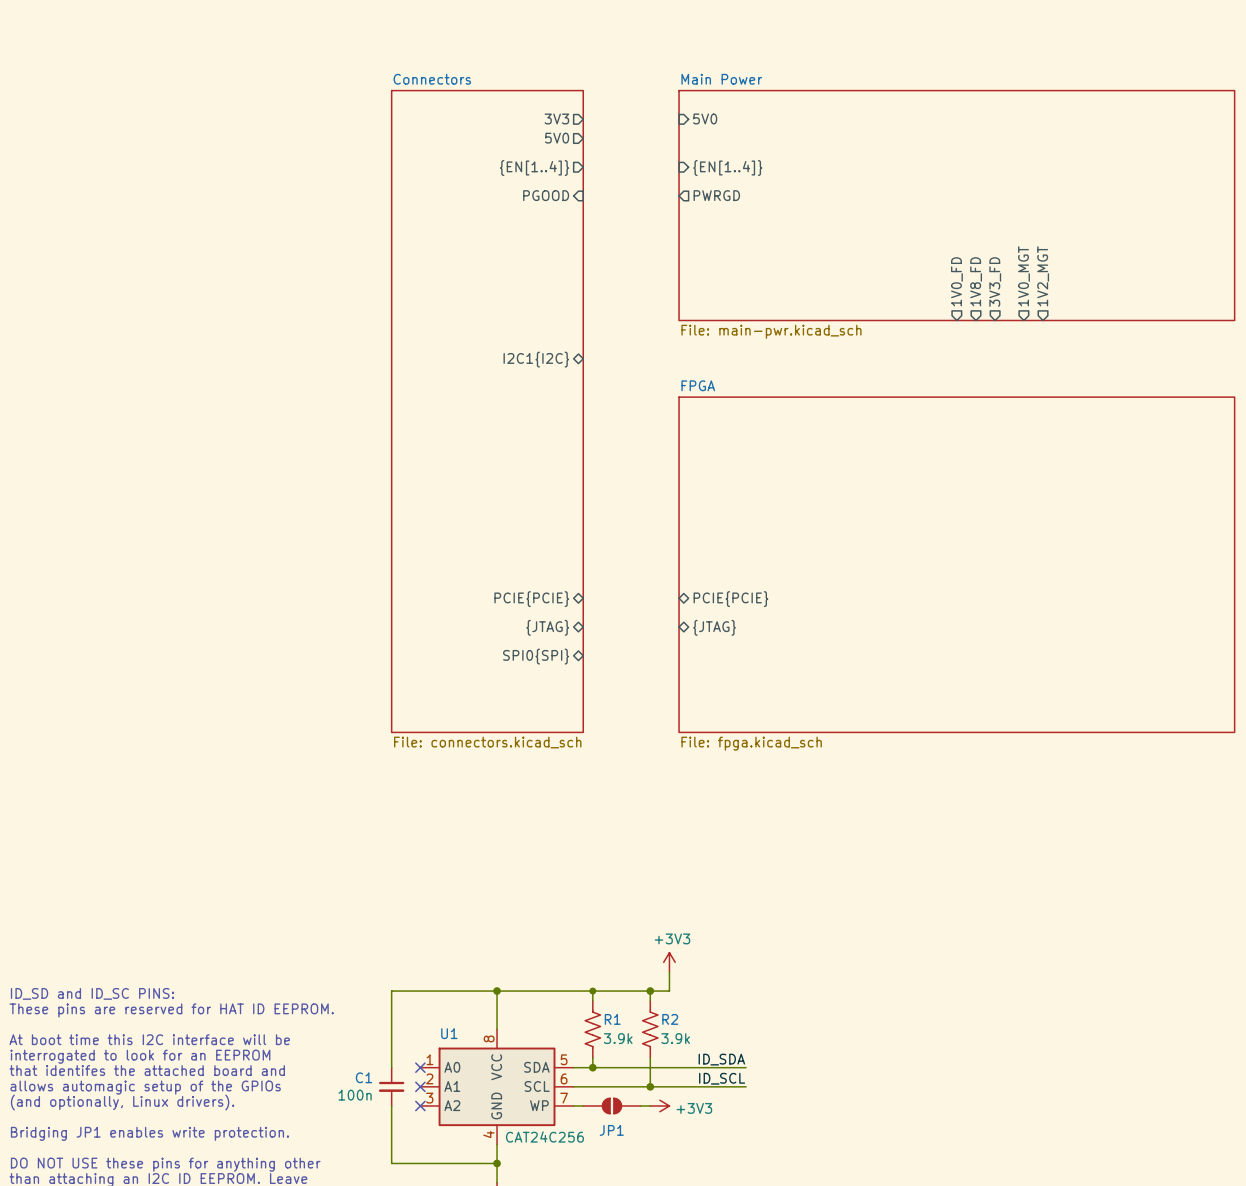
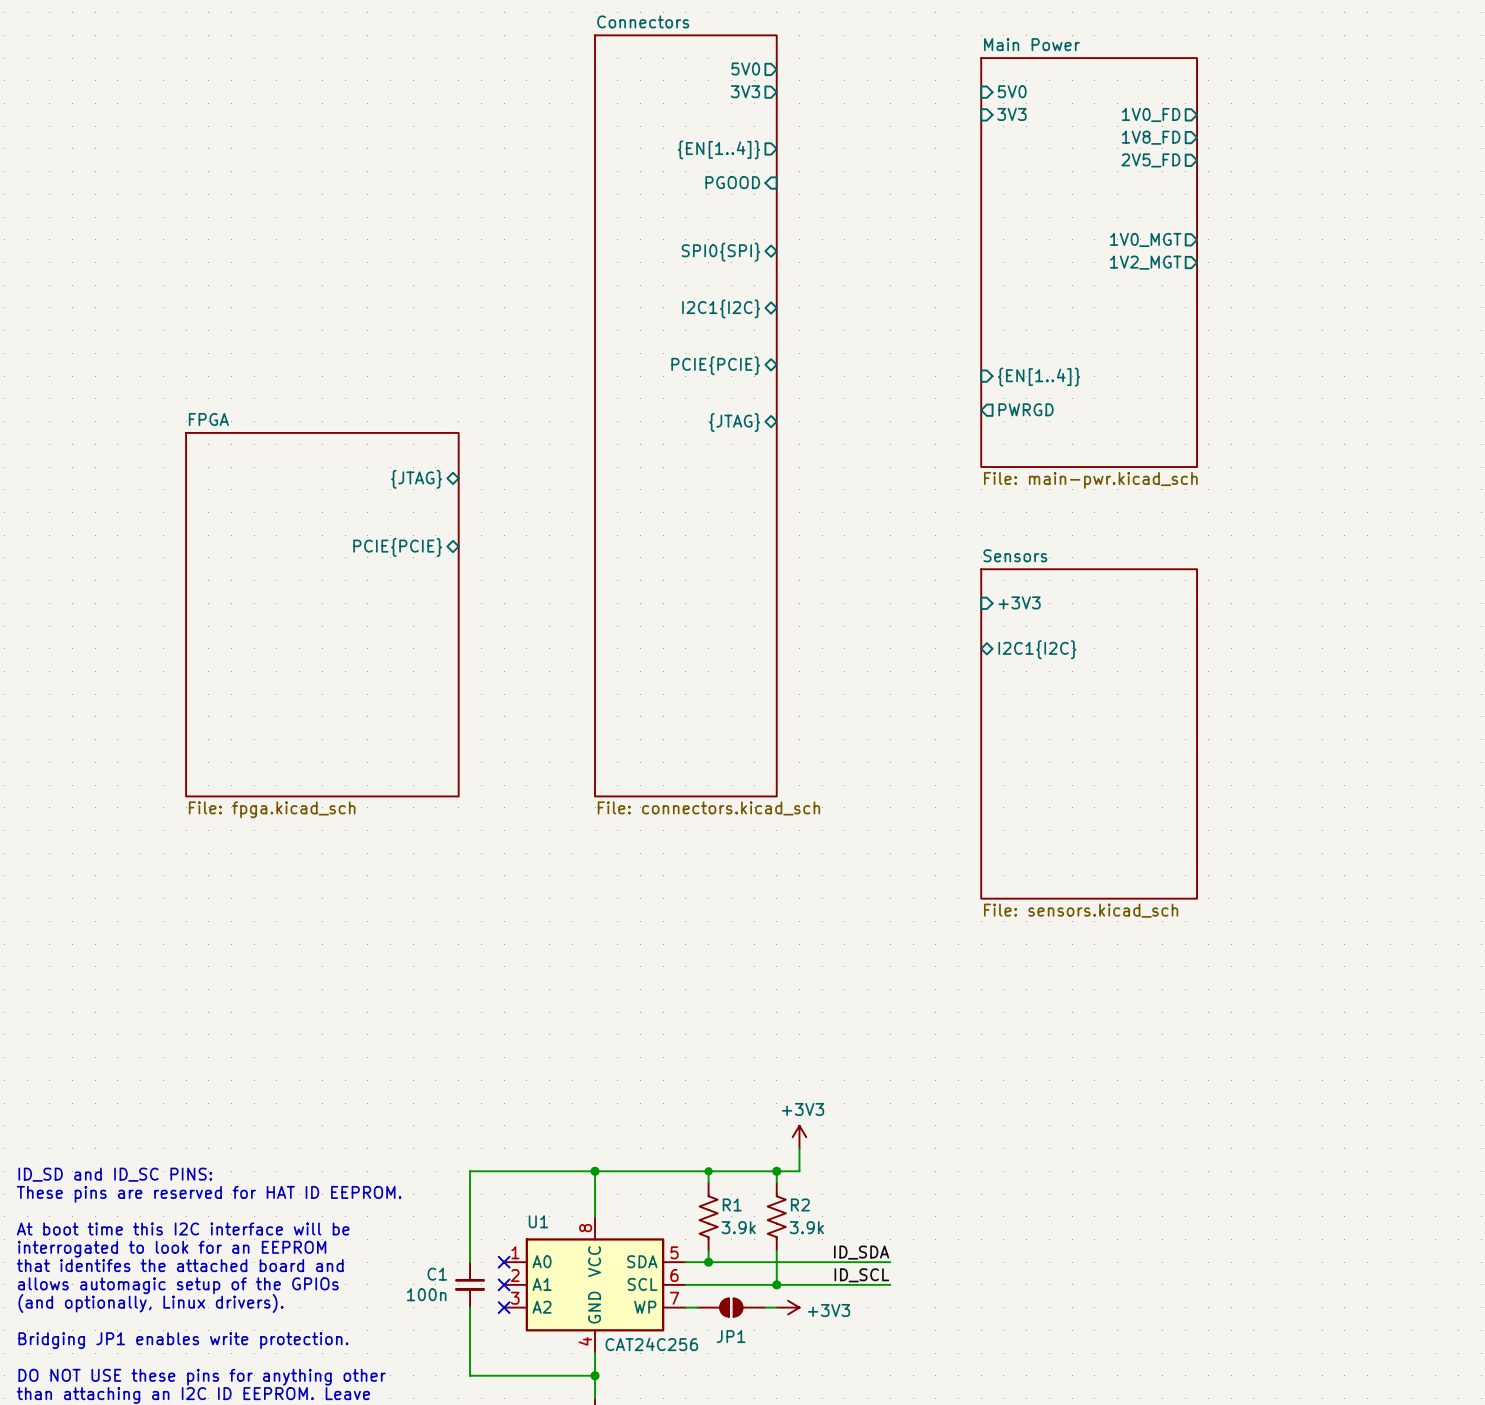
sheet pin: none -> 5V0 (745, 69)
sheet pin: none -> 5V0 (1012, 91)
sheet pin: none -> 3V3 (1011, 114)
sheet pin: none -> 1V0_FD (1151, 114)
sheet pin position: 3V3 (556, 118) -> 3V3 (745, 91)
sheet pin: 5V0 (705, 118) -> none
sheet pin: none -> 1V8_FD (1151, 137)
sheet pin: none -> {EN[1..4]} (718, 149)
sheet pin: 5V0 (557, 138) -> none
sheet pin: none -> 2V5_FD (1150, 160)
sheet pin: {EN[1..4]} (534, 168) -> none
sheet pin: {EN[1..4]} (727, 168) -> none
sheet pin position: PGOOD (546, 195) -> PGOOD (732, 182)
sheet pin: PWRGD (716, 195) -> none
sheet Main Power: File: main-pwr.kicad_sch (956, 205) -> none
sheet pin: none -> SPI0{SPI} (720, 252)
sheet Main Power: none -> File: main-pwr.kicad_sch (1089, 262)
sheet pin rotation: 0° (1023, 276) -> 90° counterclockwise (1145, 239)
sheet pin position: 1V0_MGT (1023, 276) -> 1V0_MGT (1145, 239)
sheet pin rotation: 0° (1043, 276) -> 90° counterclockwise (1145, 262)
sheet pin position: 1V2_MGT (1043, 276) -> 1V2_MGT (1145, 262)
sheet pin: 1V0_FD (956, 281) -> none
sheet pin: 1V8_FD (976, 281) -> none
sheet pin: 3V3_FD (995, 282) -> none
sheet pin: none -> PCIE{PCIE} (715, 365)
sheet pin: none -> {EN[1..4]} (1039, 377)
sheet pin: none -> PWRGD (1026, 409)
sheet Connectors: none -> File: connectors.kicad_sch (685, 415)
sheet pin position: I2C1{I2C} (536, 359) -> I2C1{I2C} (721, 308)
sheet pin: none -> {JTAG} (734, 422)
sheet pin: none -> {JTAG} (416, 479)
sheet Connectors: File: connectors.kicad_sch (487, 411) -> none
sheet pin: none -> PCIE{PCIE} (397, 547)
sheet pin: none -> +3V3 (1019, 602)
sheet FPGA: none -> File: fpga.kicad_sch (322, 614)
sheet pin: none -> I2C1{I2C} (1037, 649)
sheet FPGA: File: fpga.kicad_sch (956, 564) -> none
sheet pin: PCIE{PCIE} (531, 599) -> none
sheet pin: PCIE{PCIE} (730, 599) -> none
sheet Sensors: none -> File: sensors.kicad_sch (1089, 733)
sheet pin: {JTAG} (547, 627) -> none
sheet pin: {JTAG} (714, 627) -> none
sheet pin: SPI0{SPI} (536, 656) -> none

